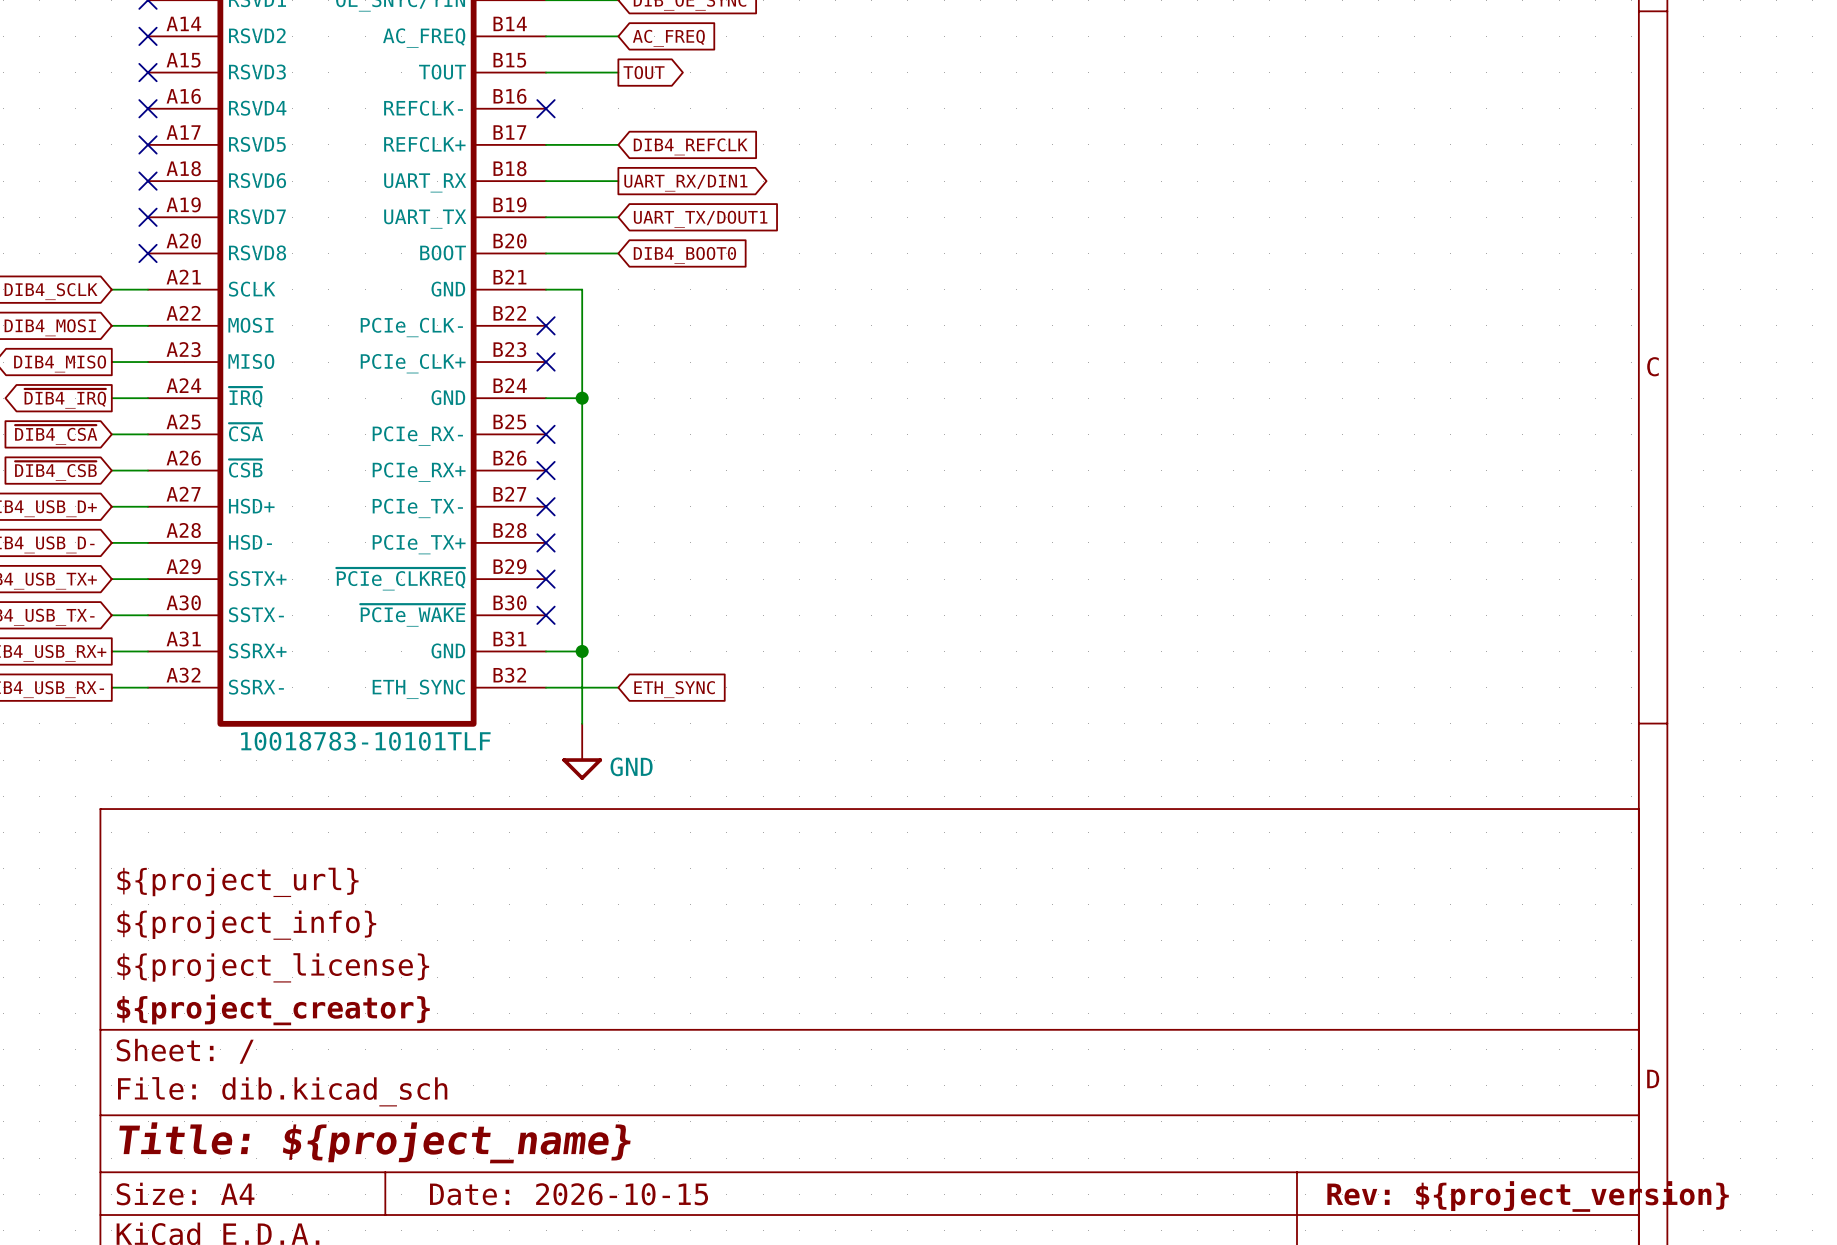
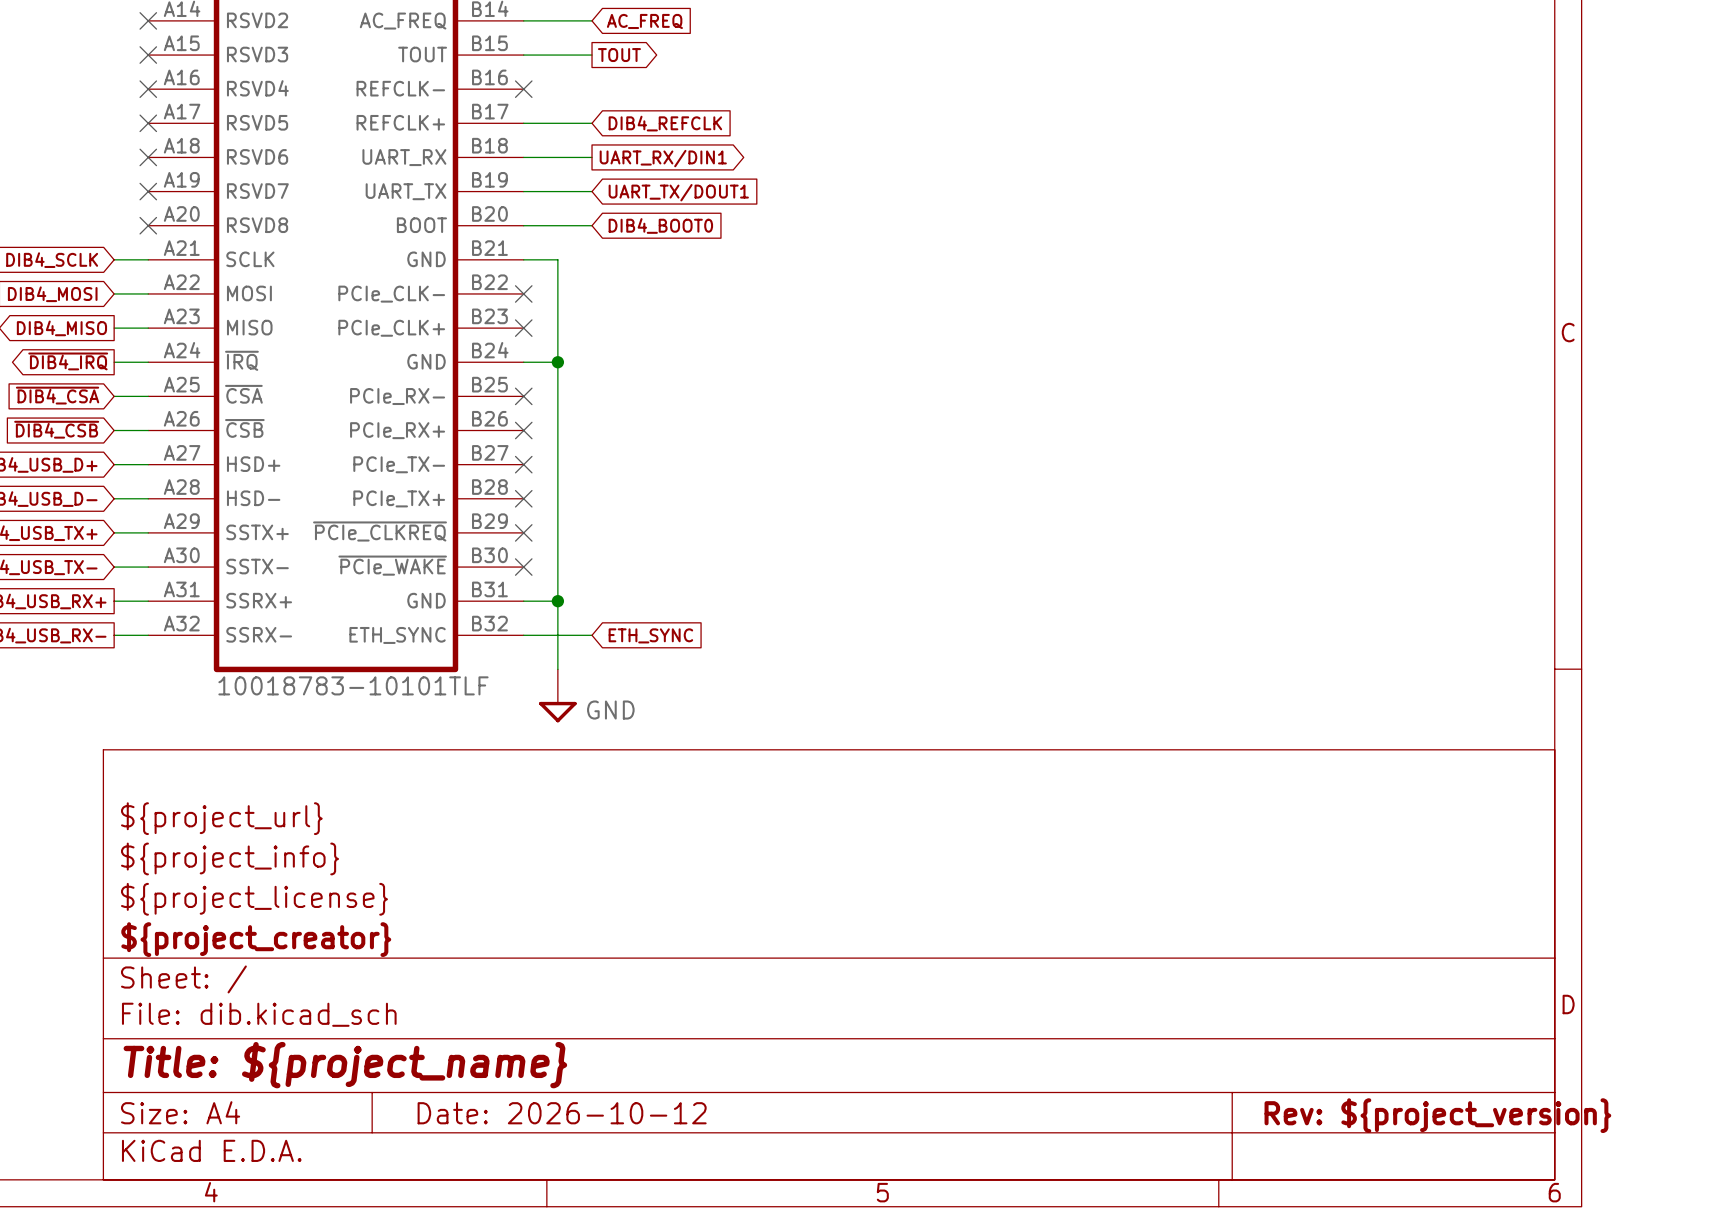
title block: Date: 2026-10-15 (569, 1194) -> Date: 2026-10-12 (562, 1113)

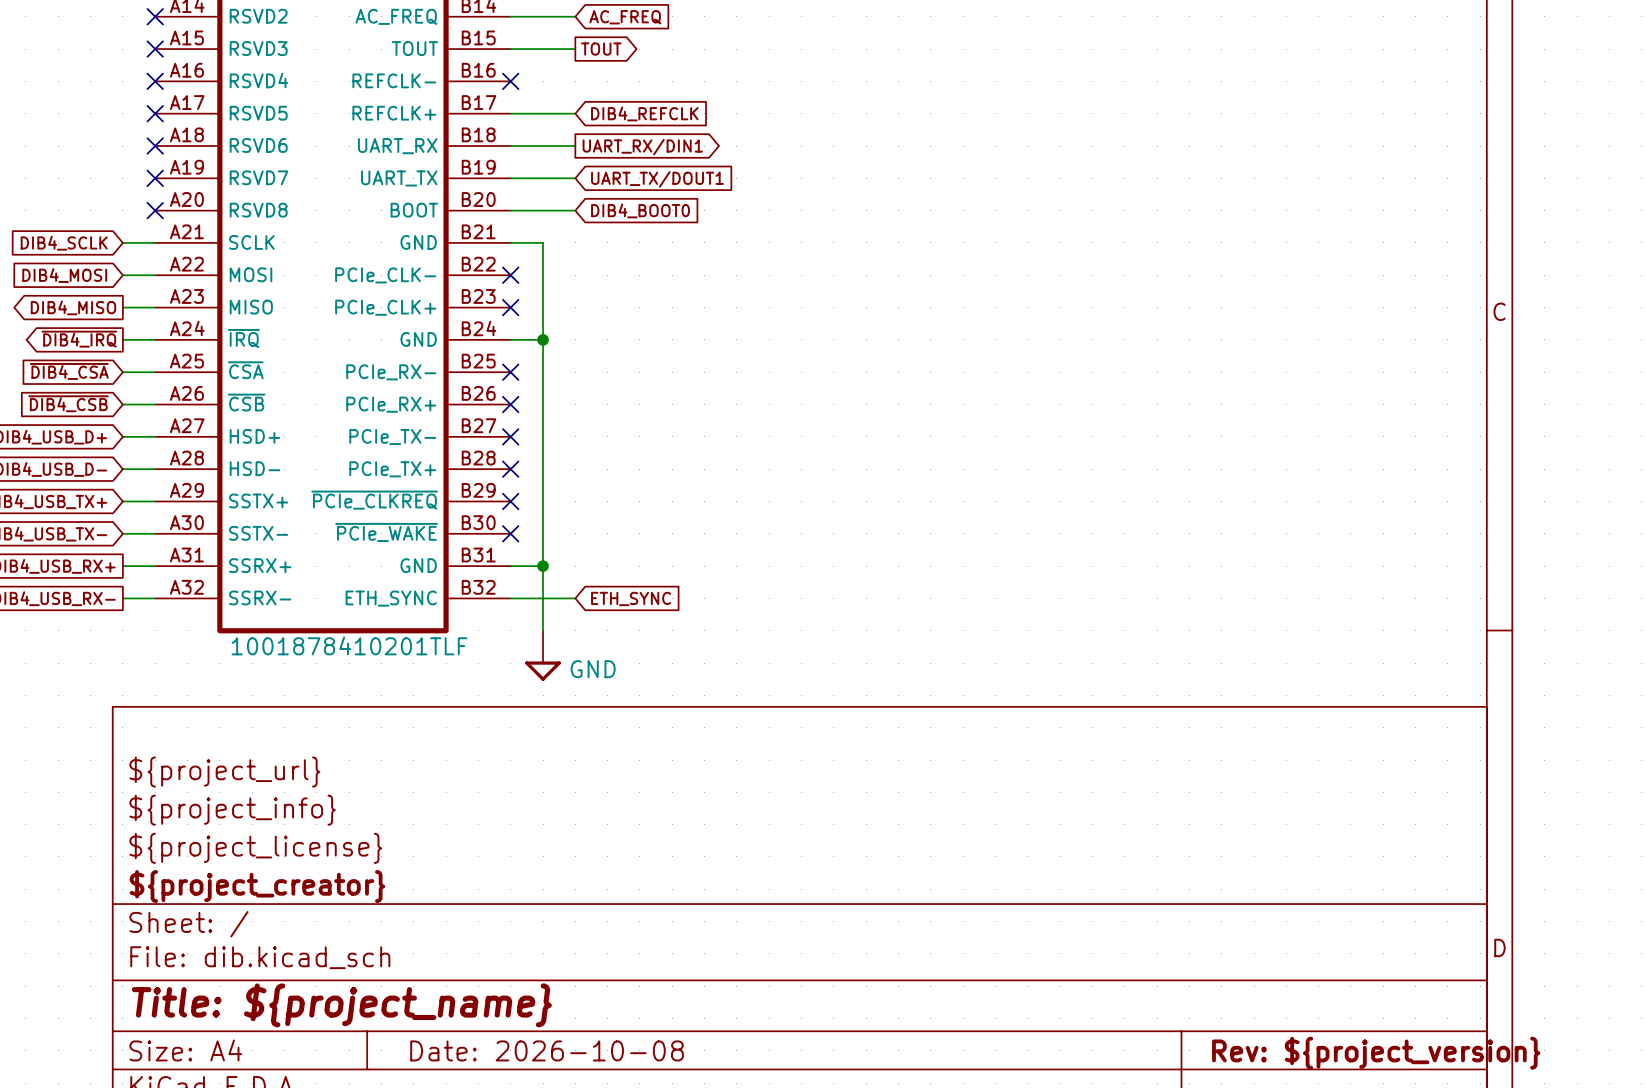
part value: 10018783-10101TLF (353, 685) -> 1001878410201TLF (349, 645)
title block: Date: 2026-10-12 (562, 1113) -> Date: 2026-10-08 (547, 1050)

